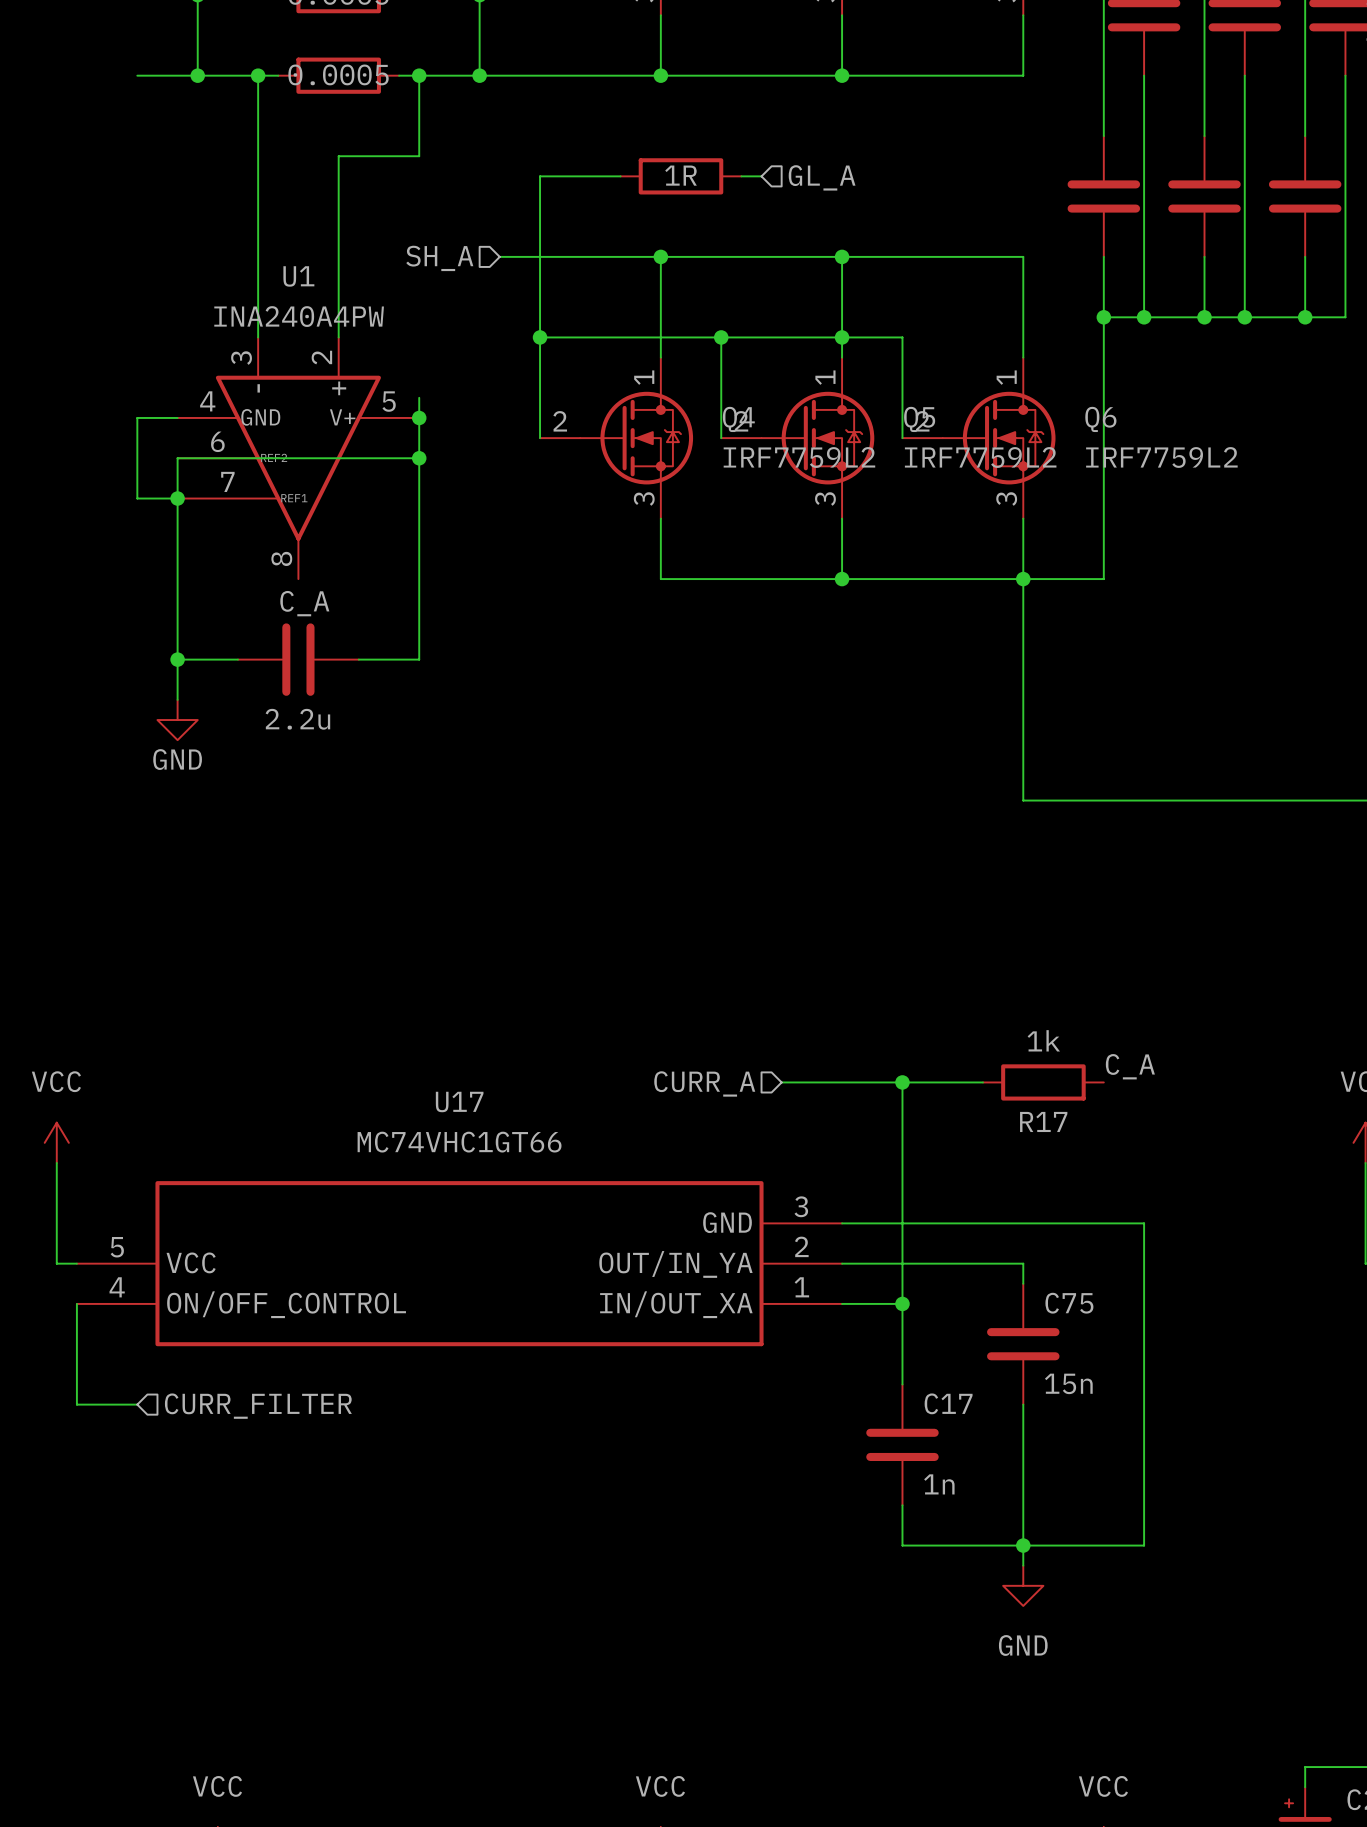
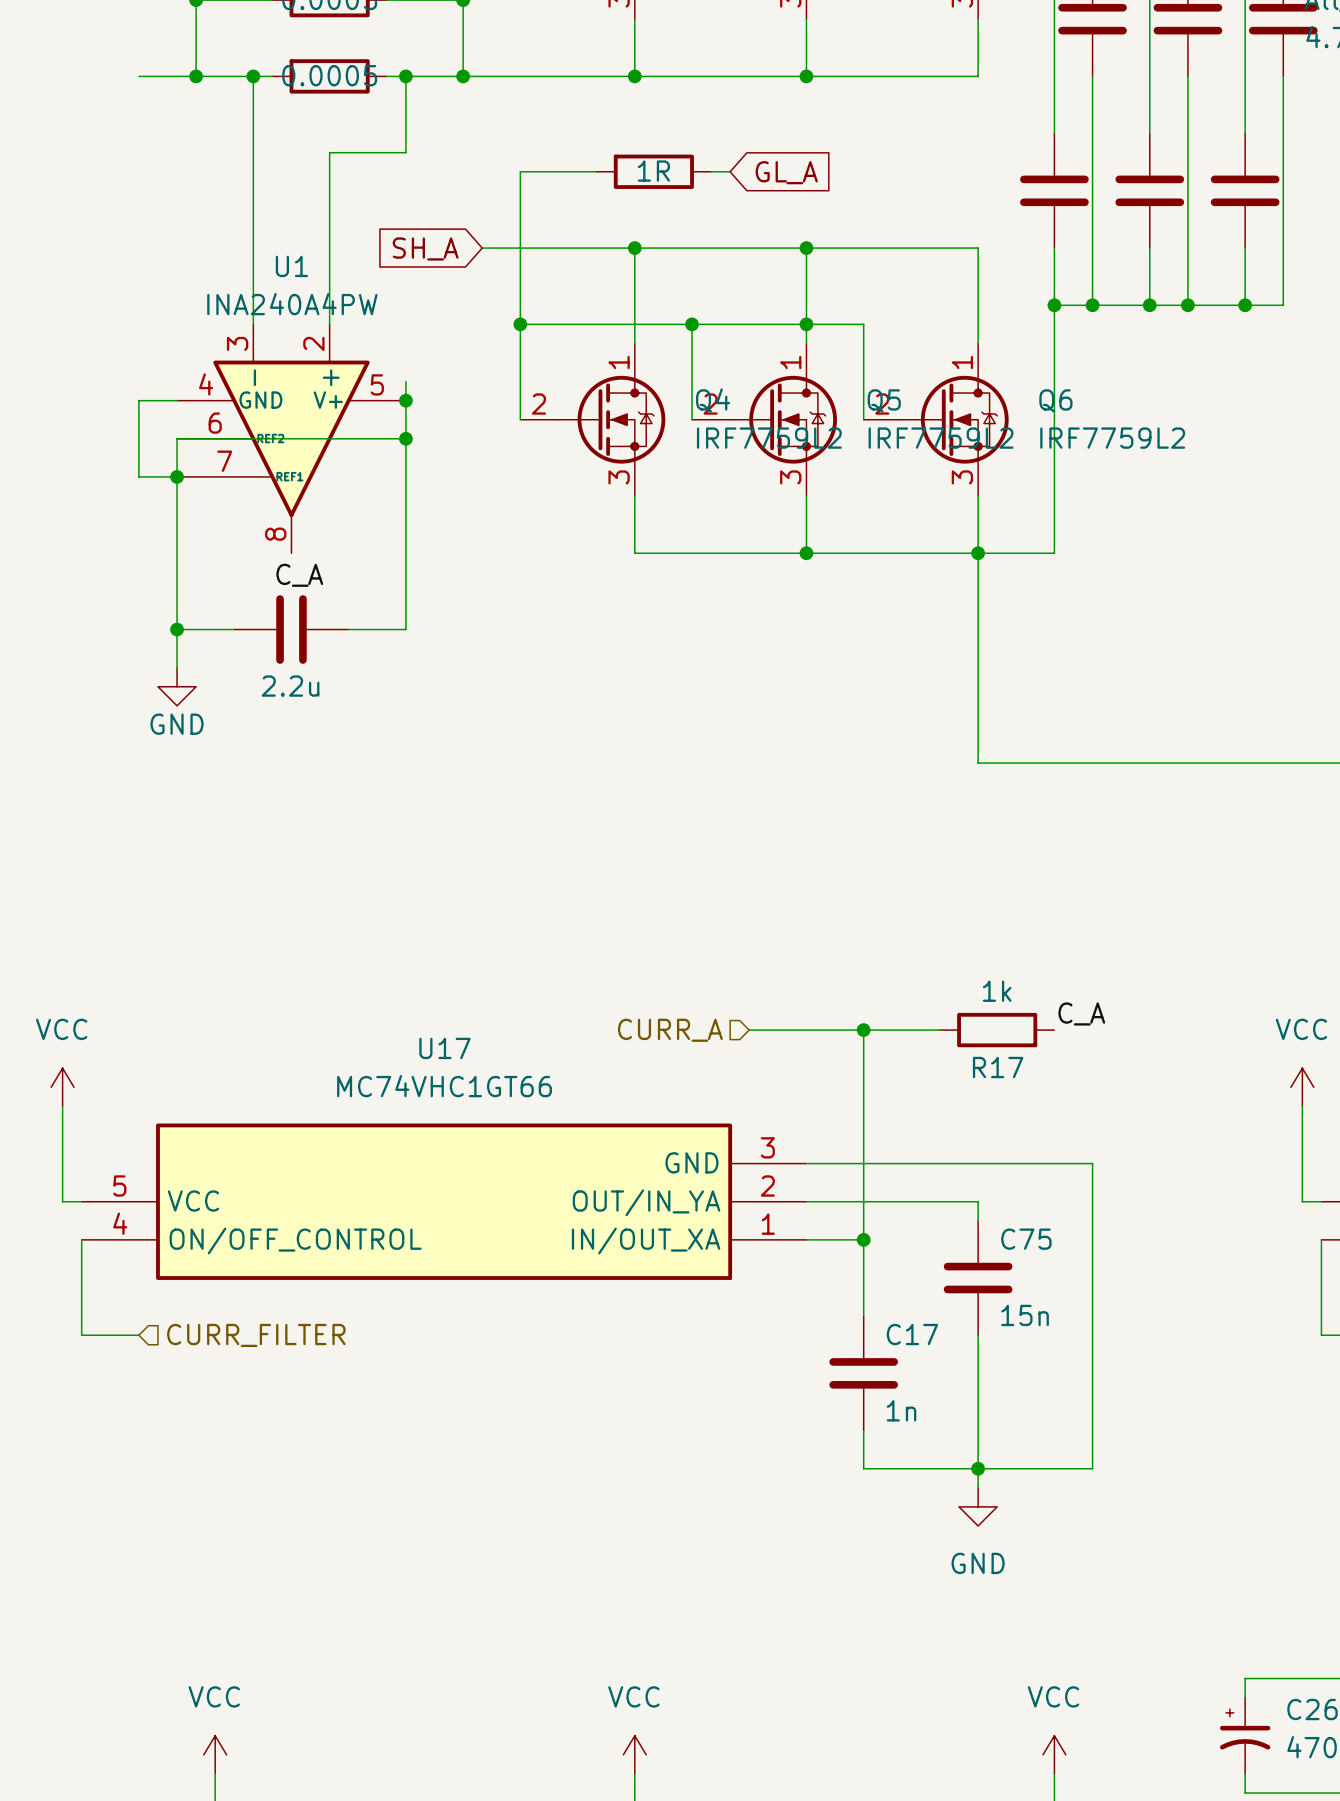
hierarchical label: GL_A (822, 177) -> none
global label: none -> GL_A (786, 172)
hierarchical label: SH_A (439, 258) -> none
global label: none -> SH_A (425, 248)

